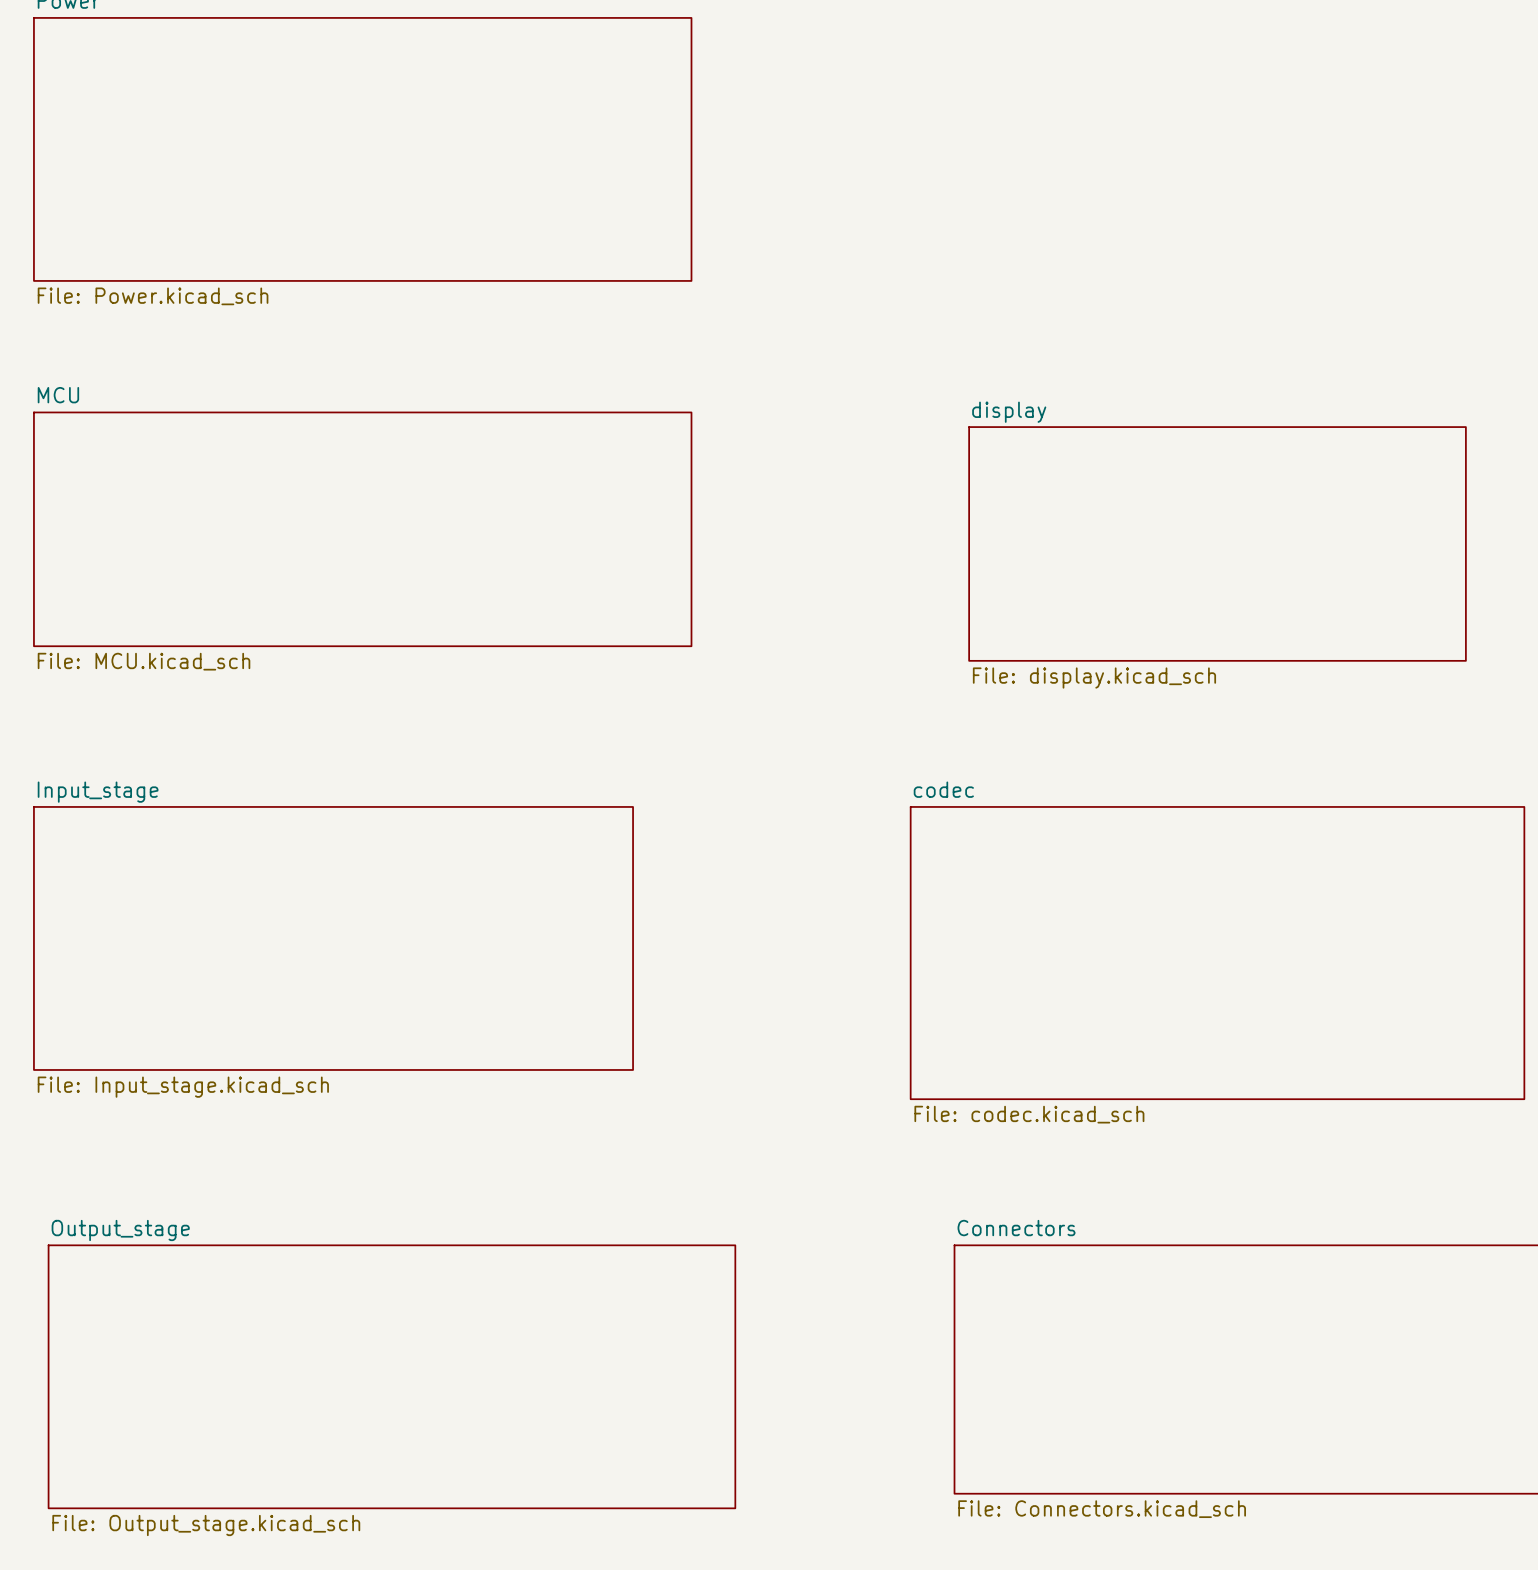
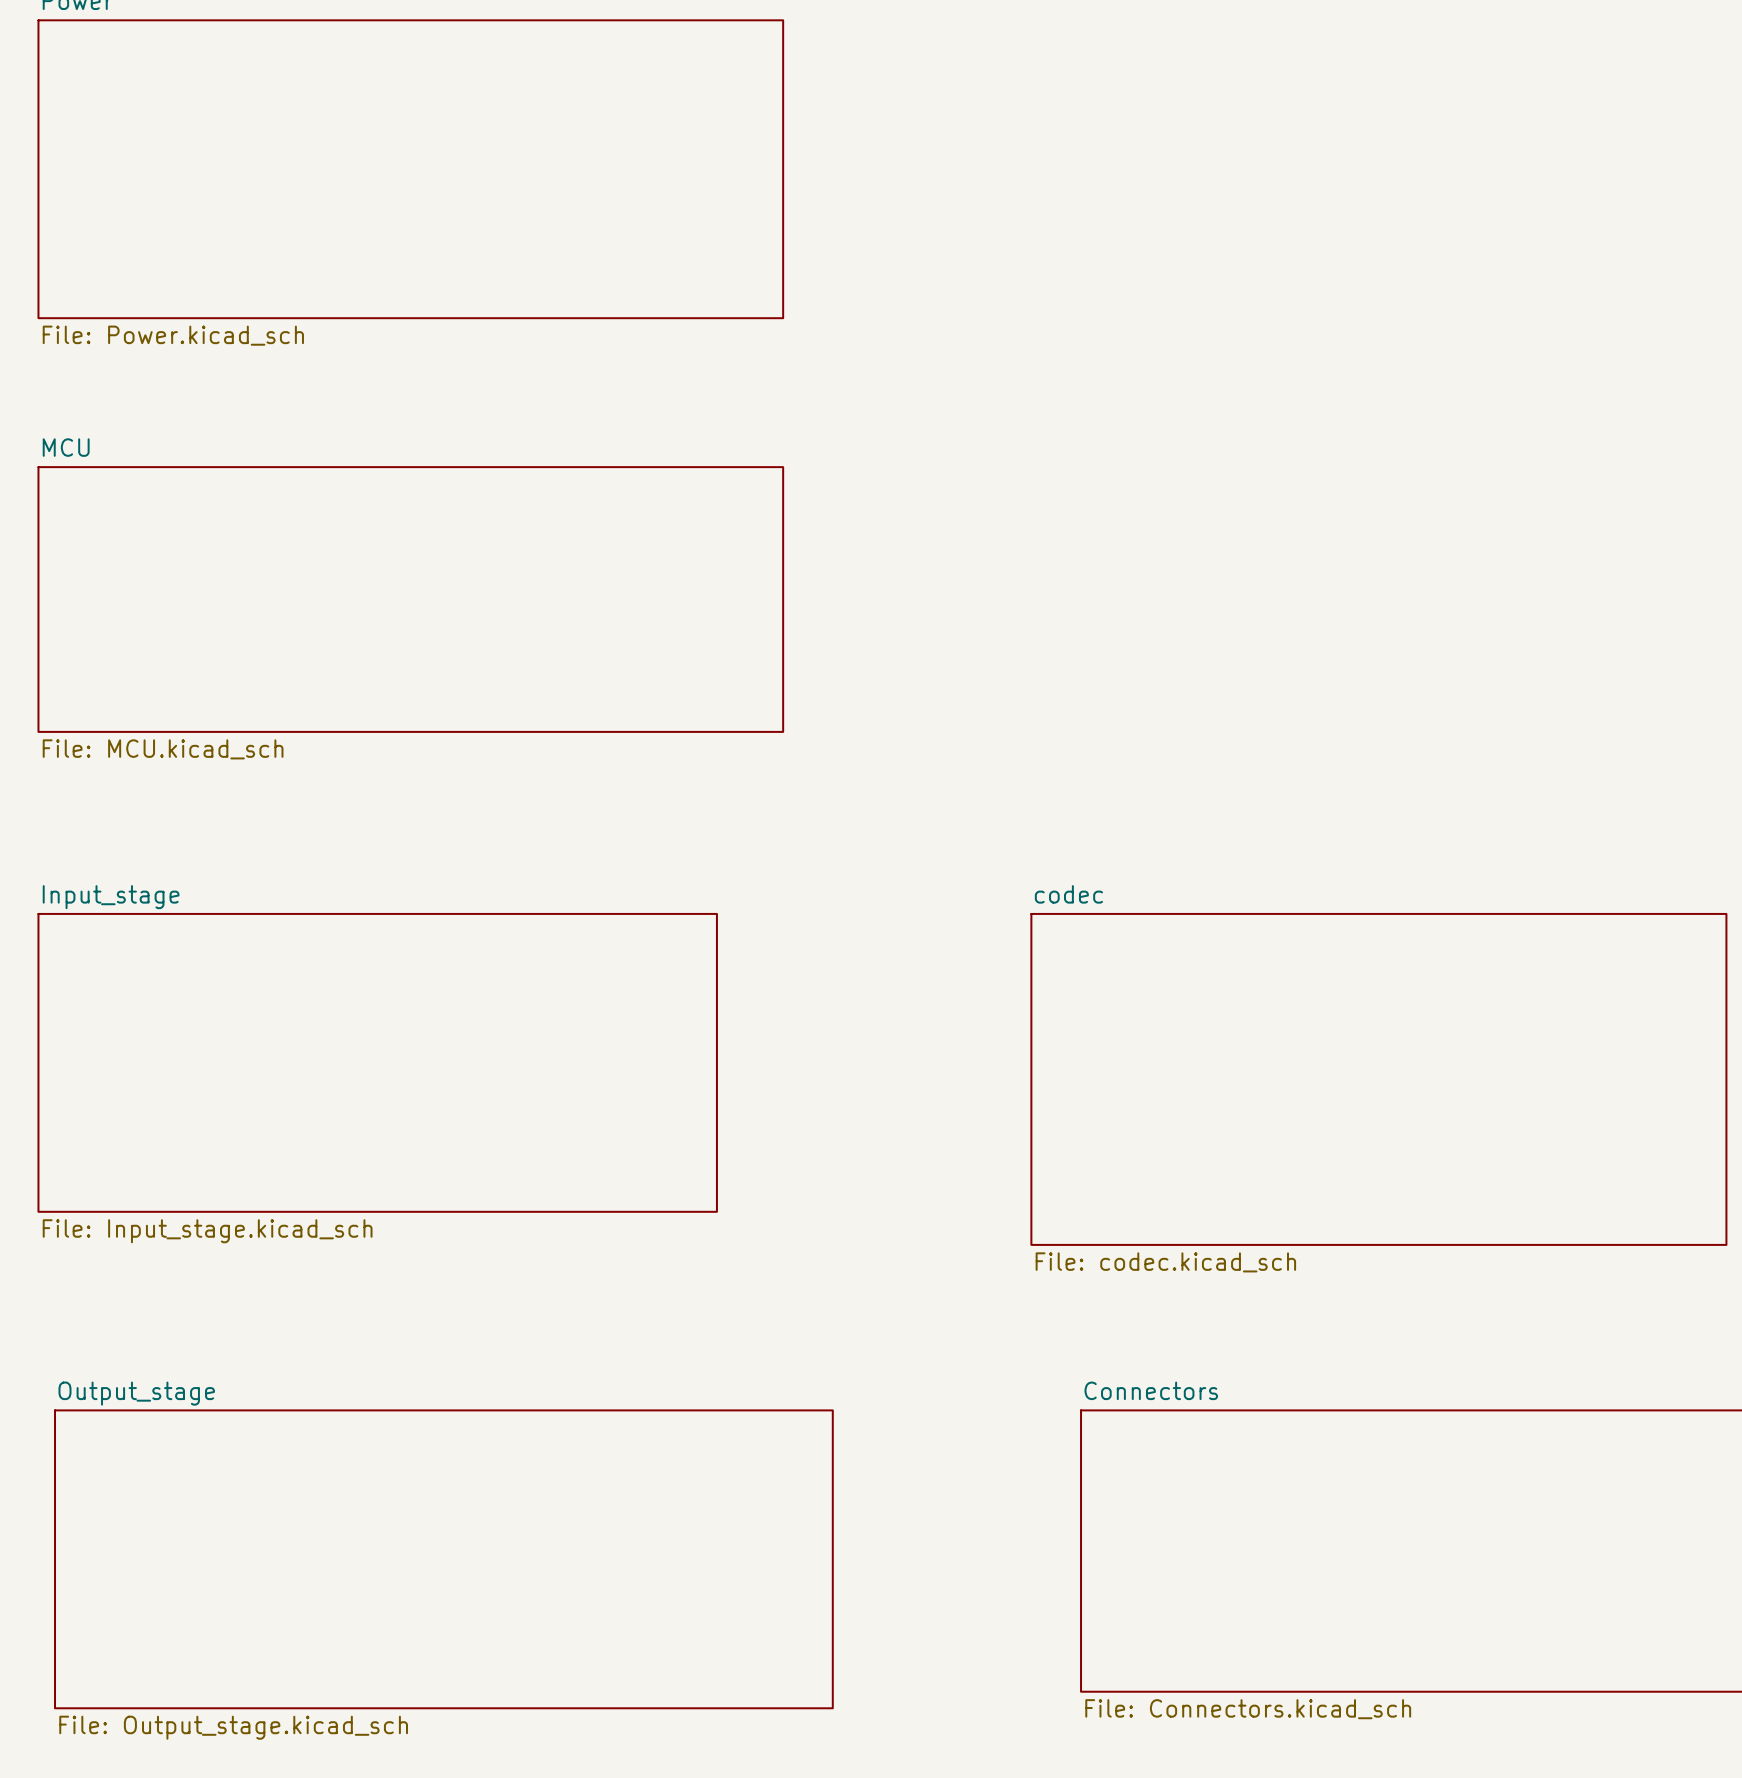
sheet display: File: display.kicad_sch (1217, 543) -> none

